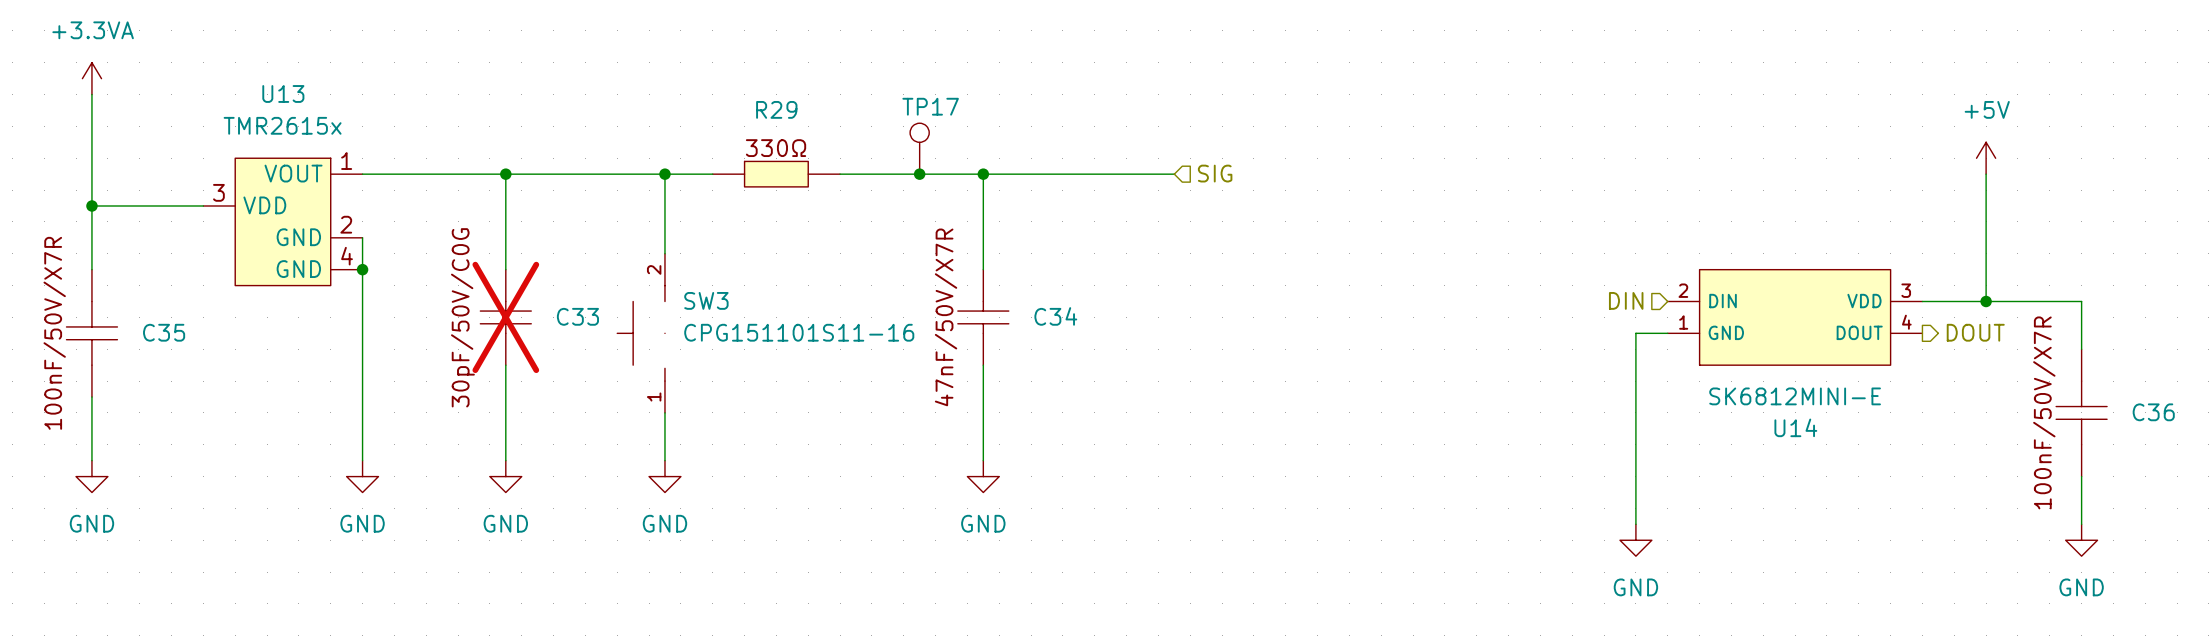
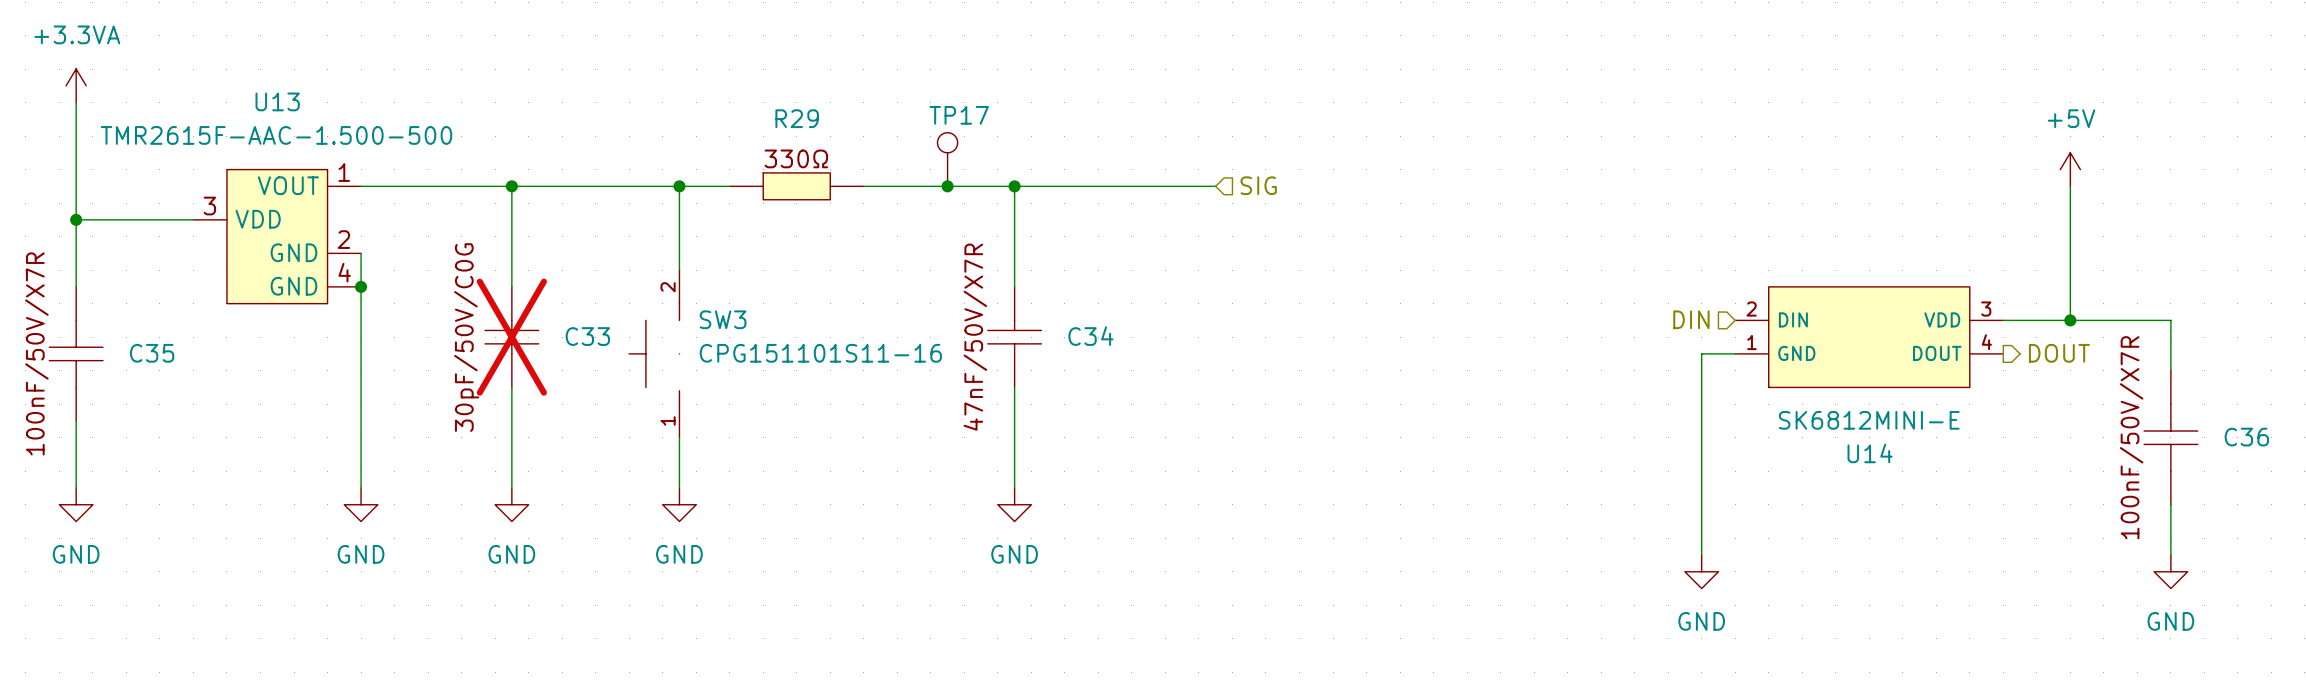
U13 value: TMR2615x (282, 125) -> TMR2615F-AAC-1.500-500 (276, 135)

